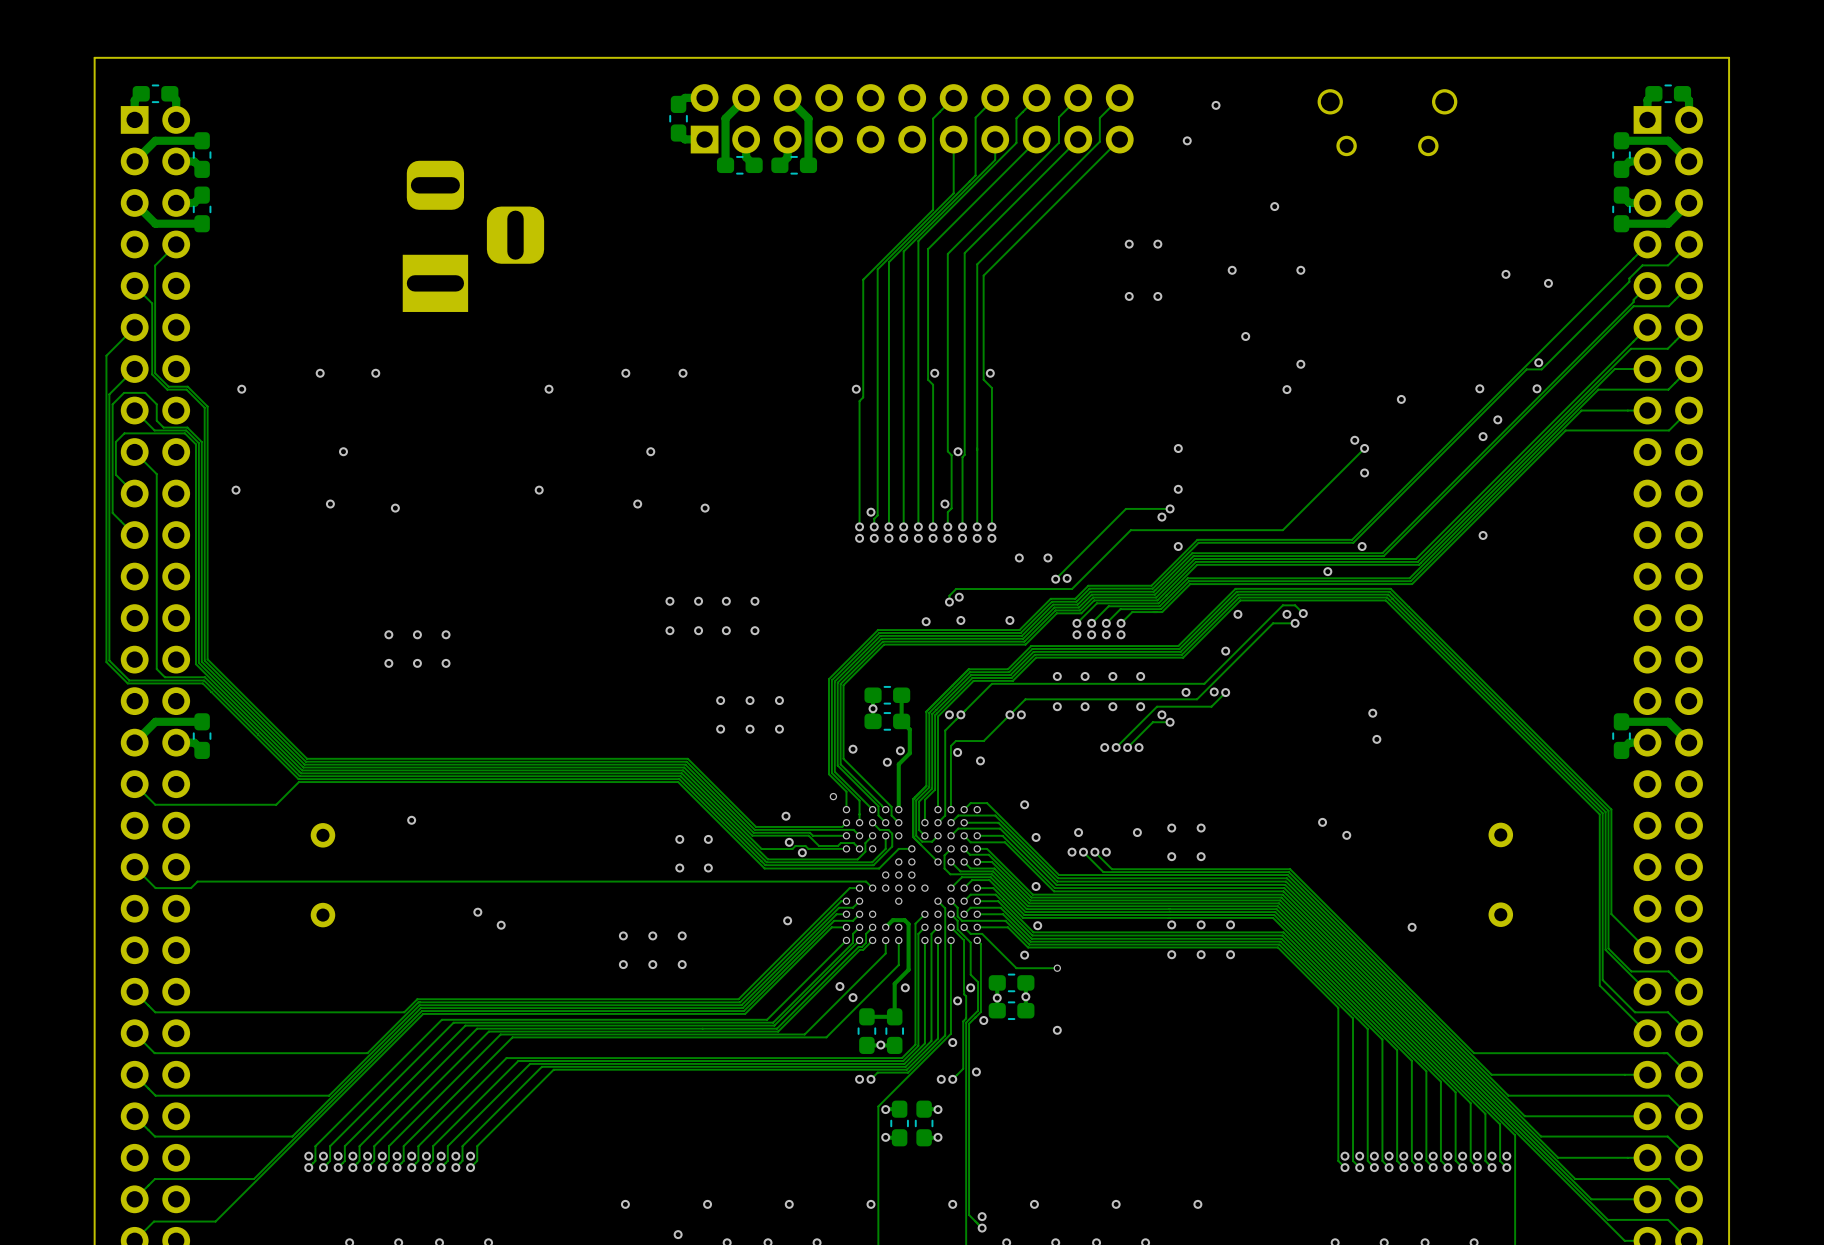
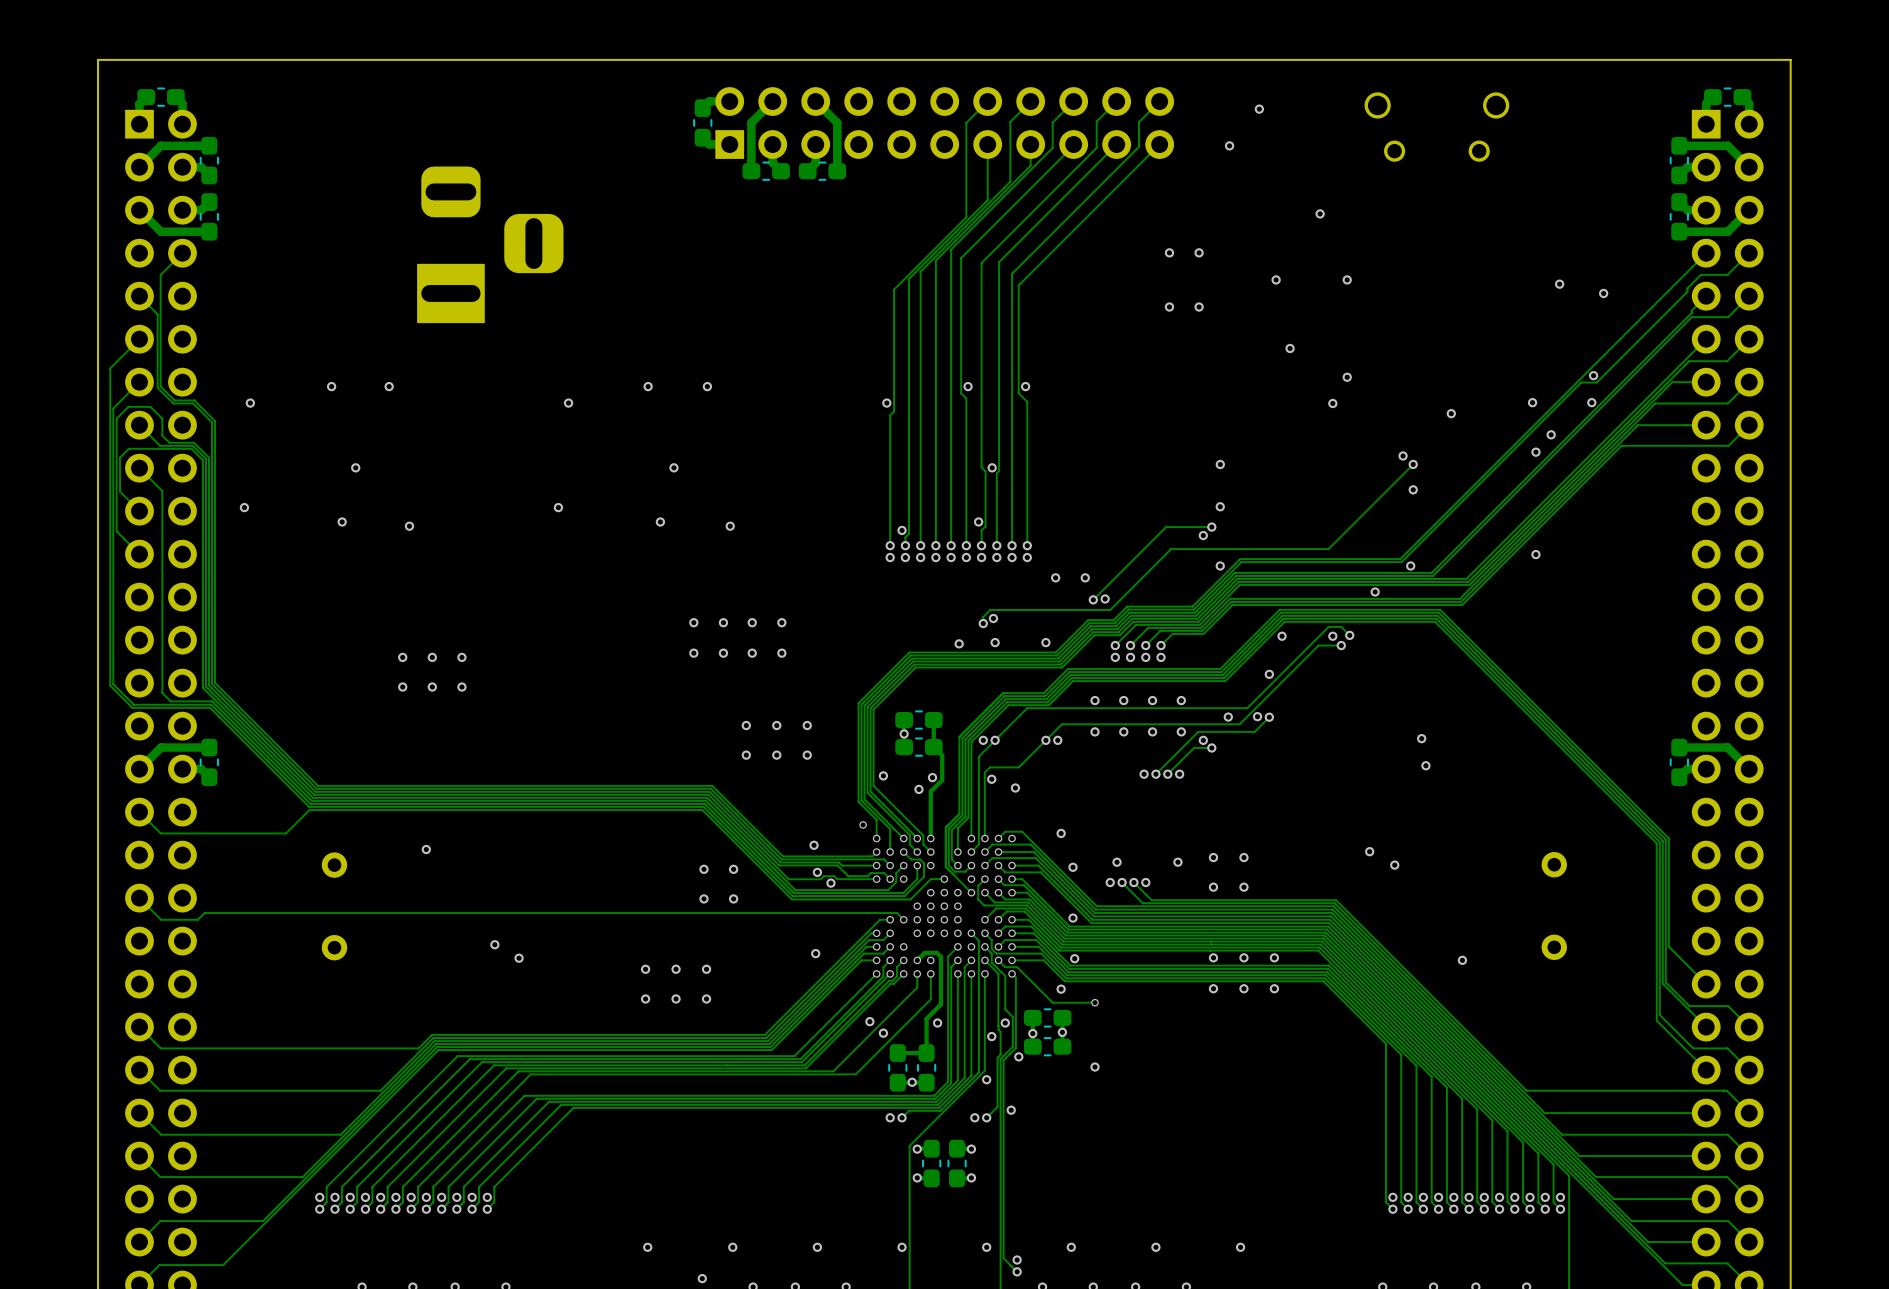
via: none -> (957, 892)
via: none -> (957, 906)
via: none -> (917, 933)
via: none -> (944, 933)
via: none -> (957, 933)

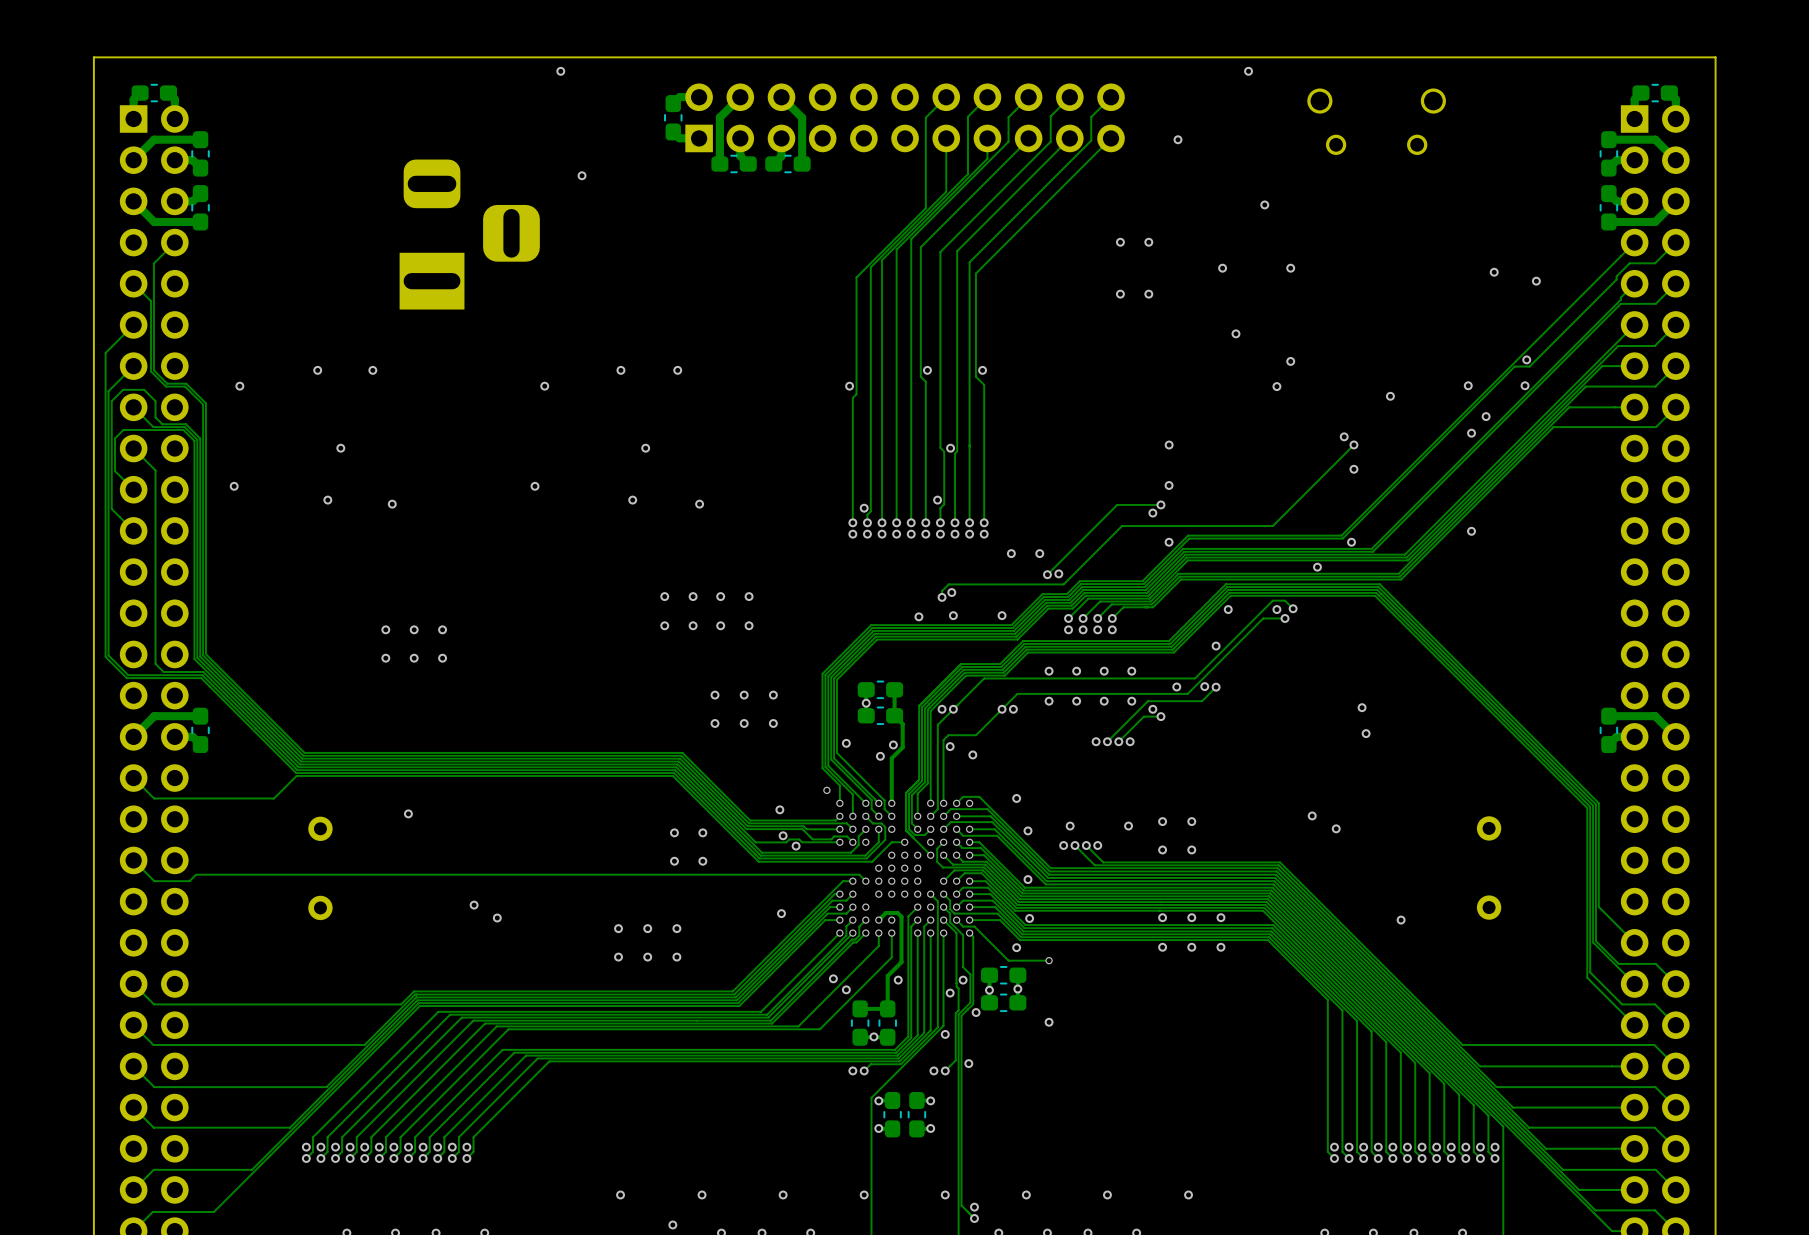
via: none -> (560, 71)
via position: (1259, 109) -> (1248, 71)
via: none -> (582, 175)

